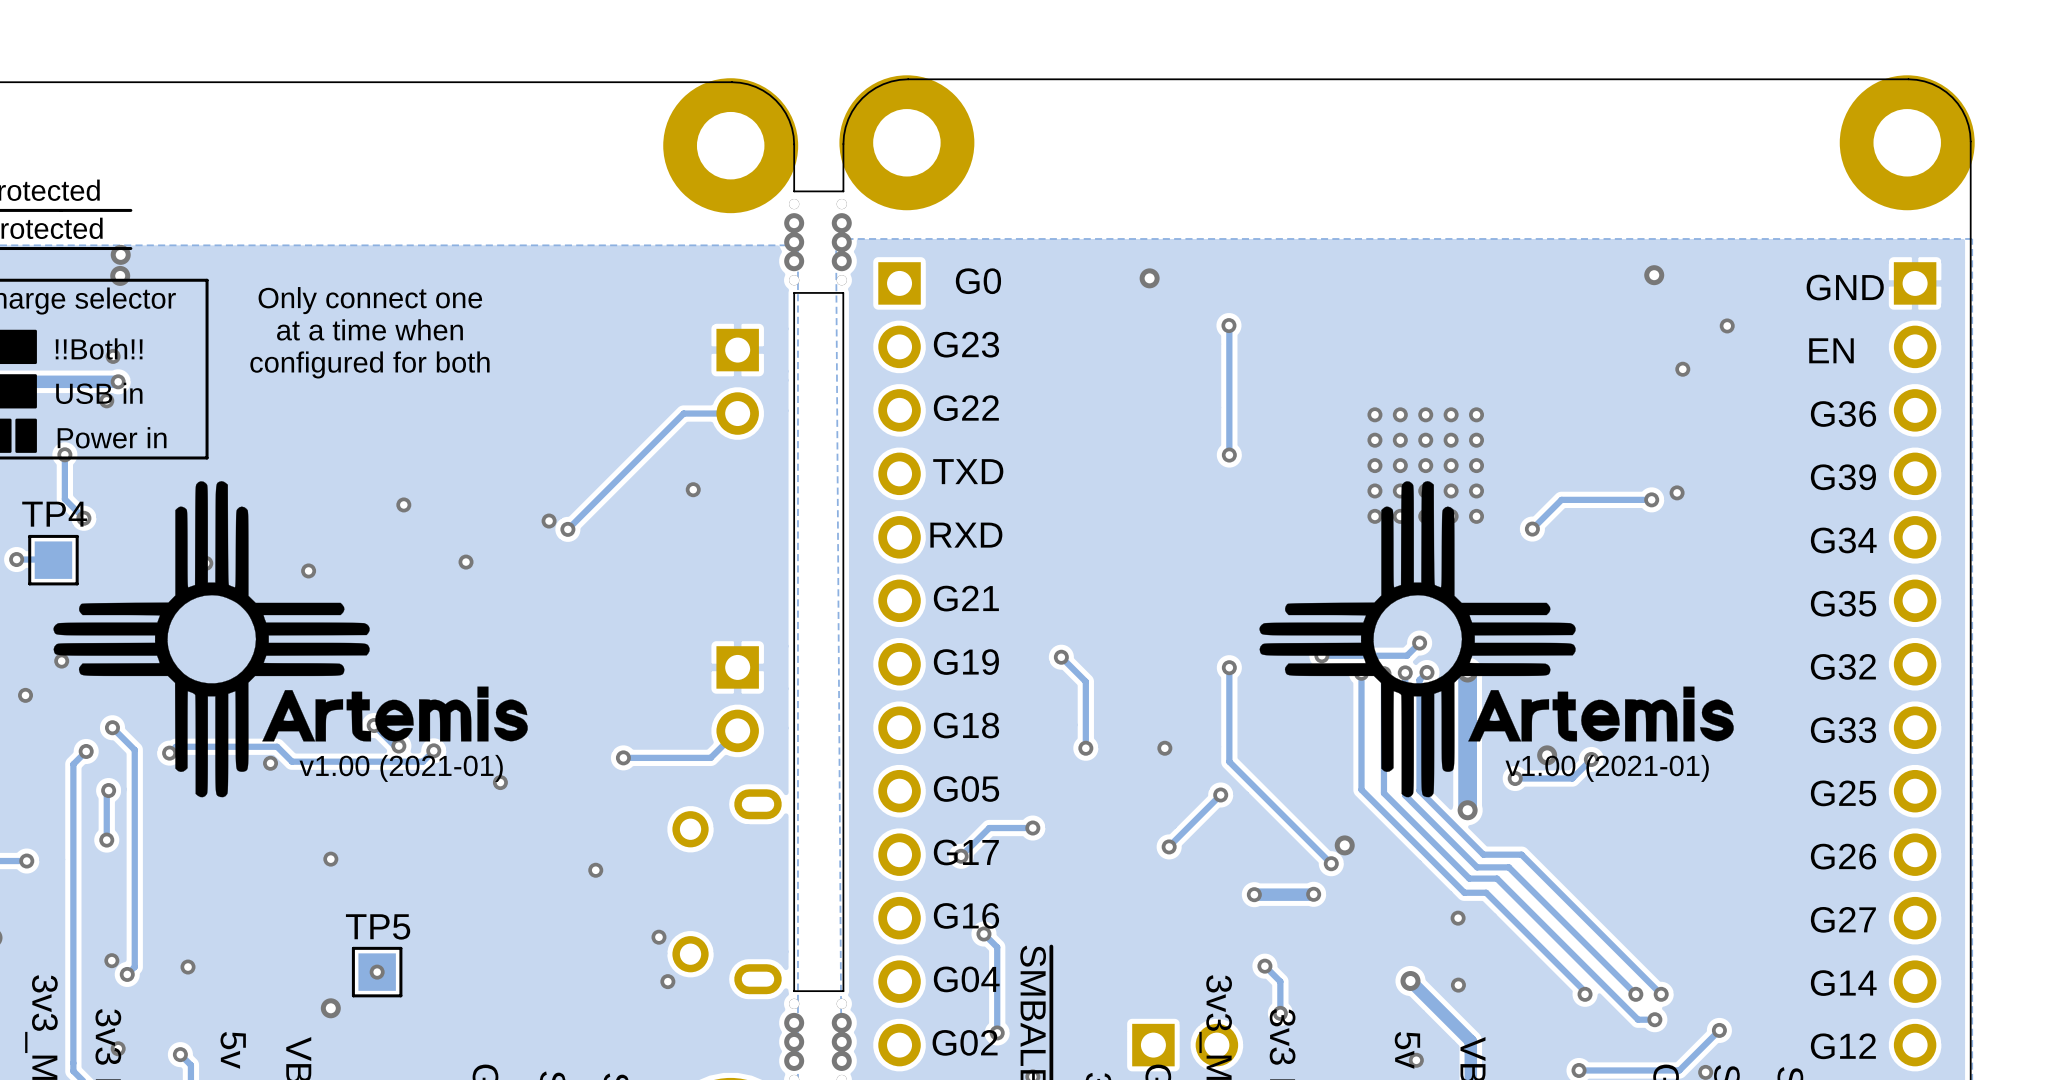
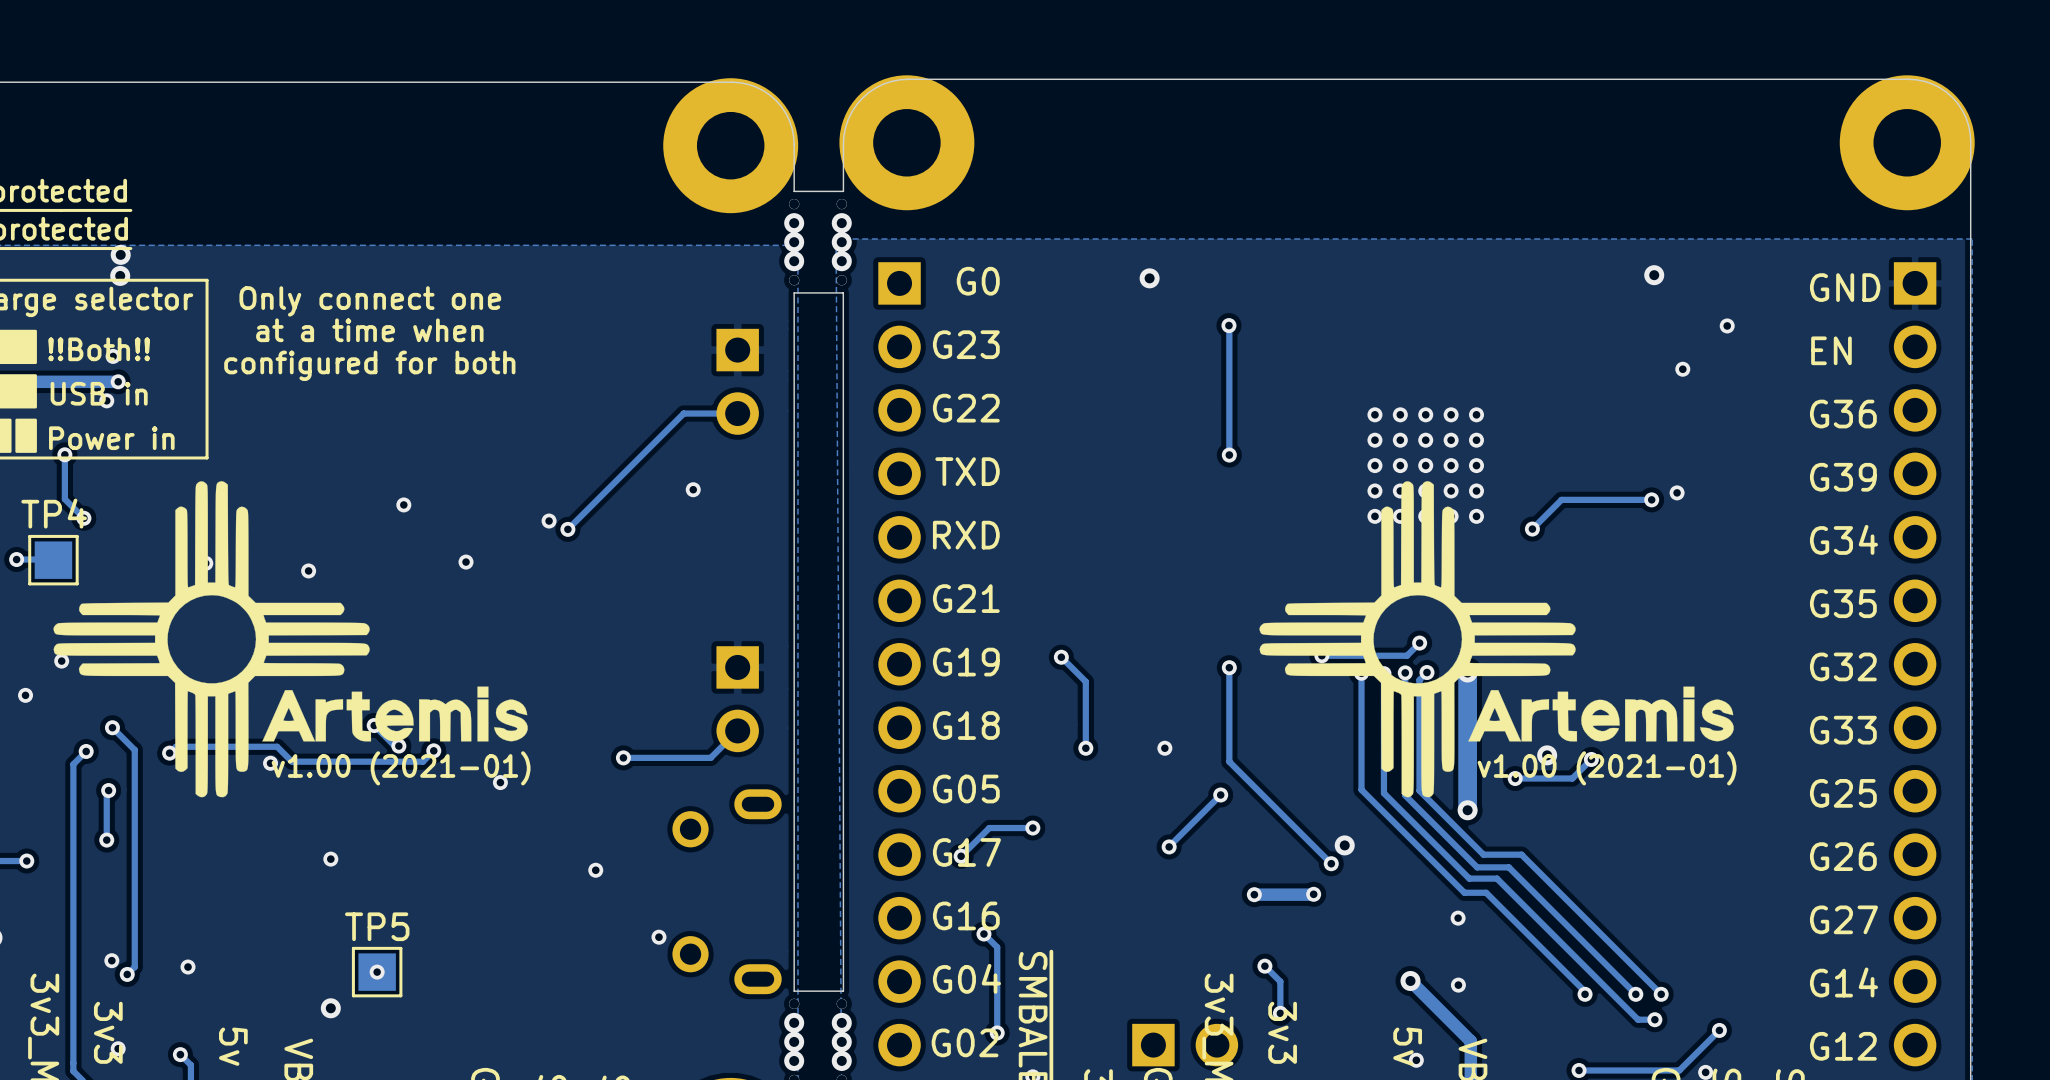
via: (667, 981) -> none

